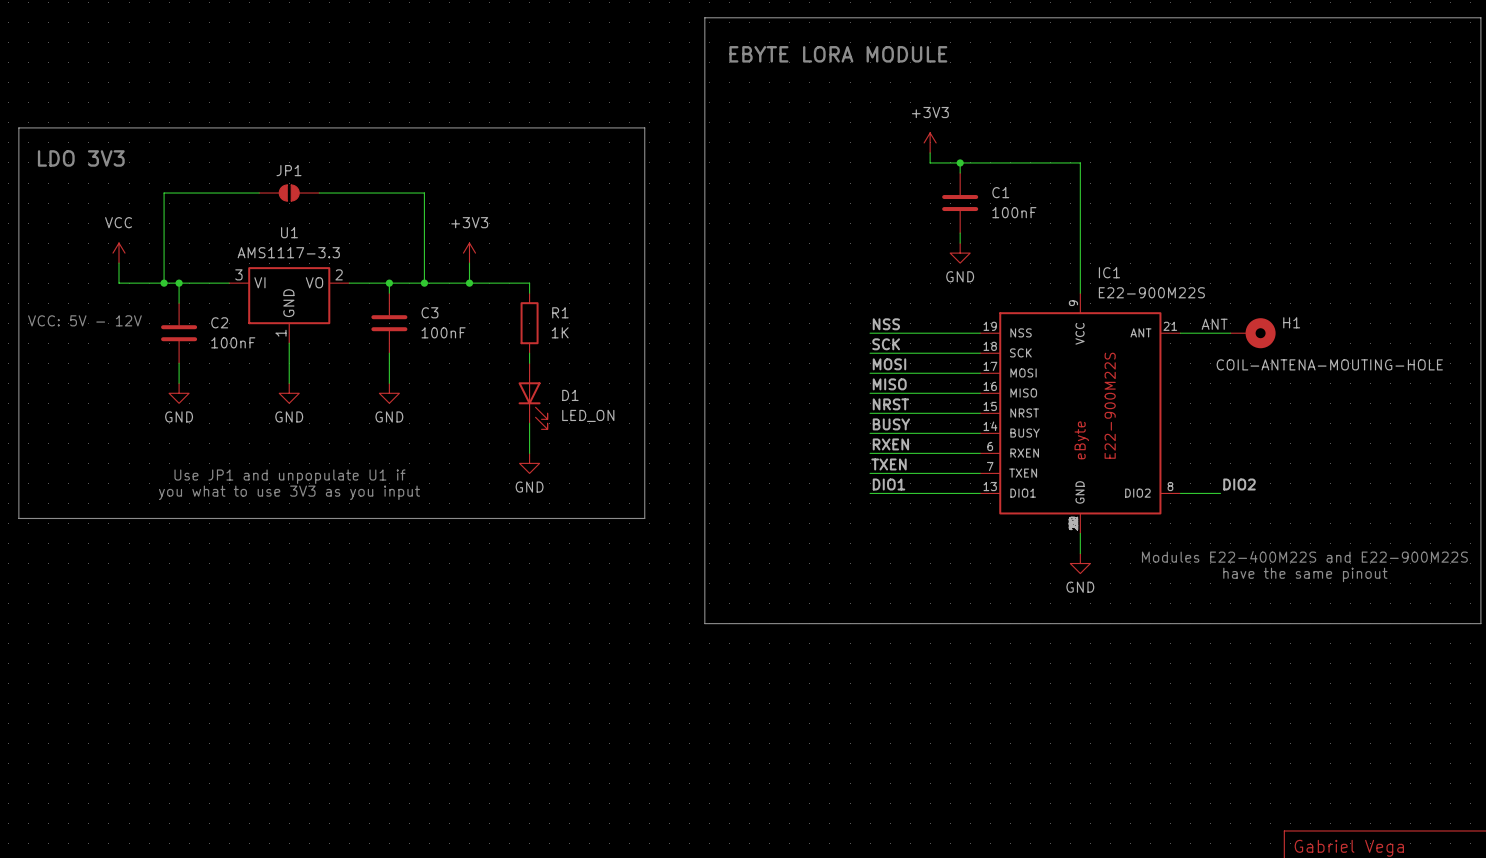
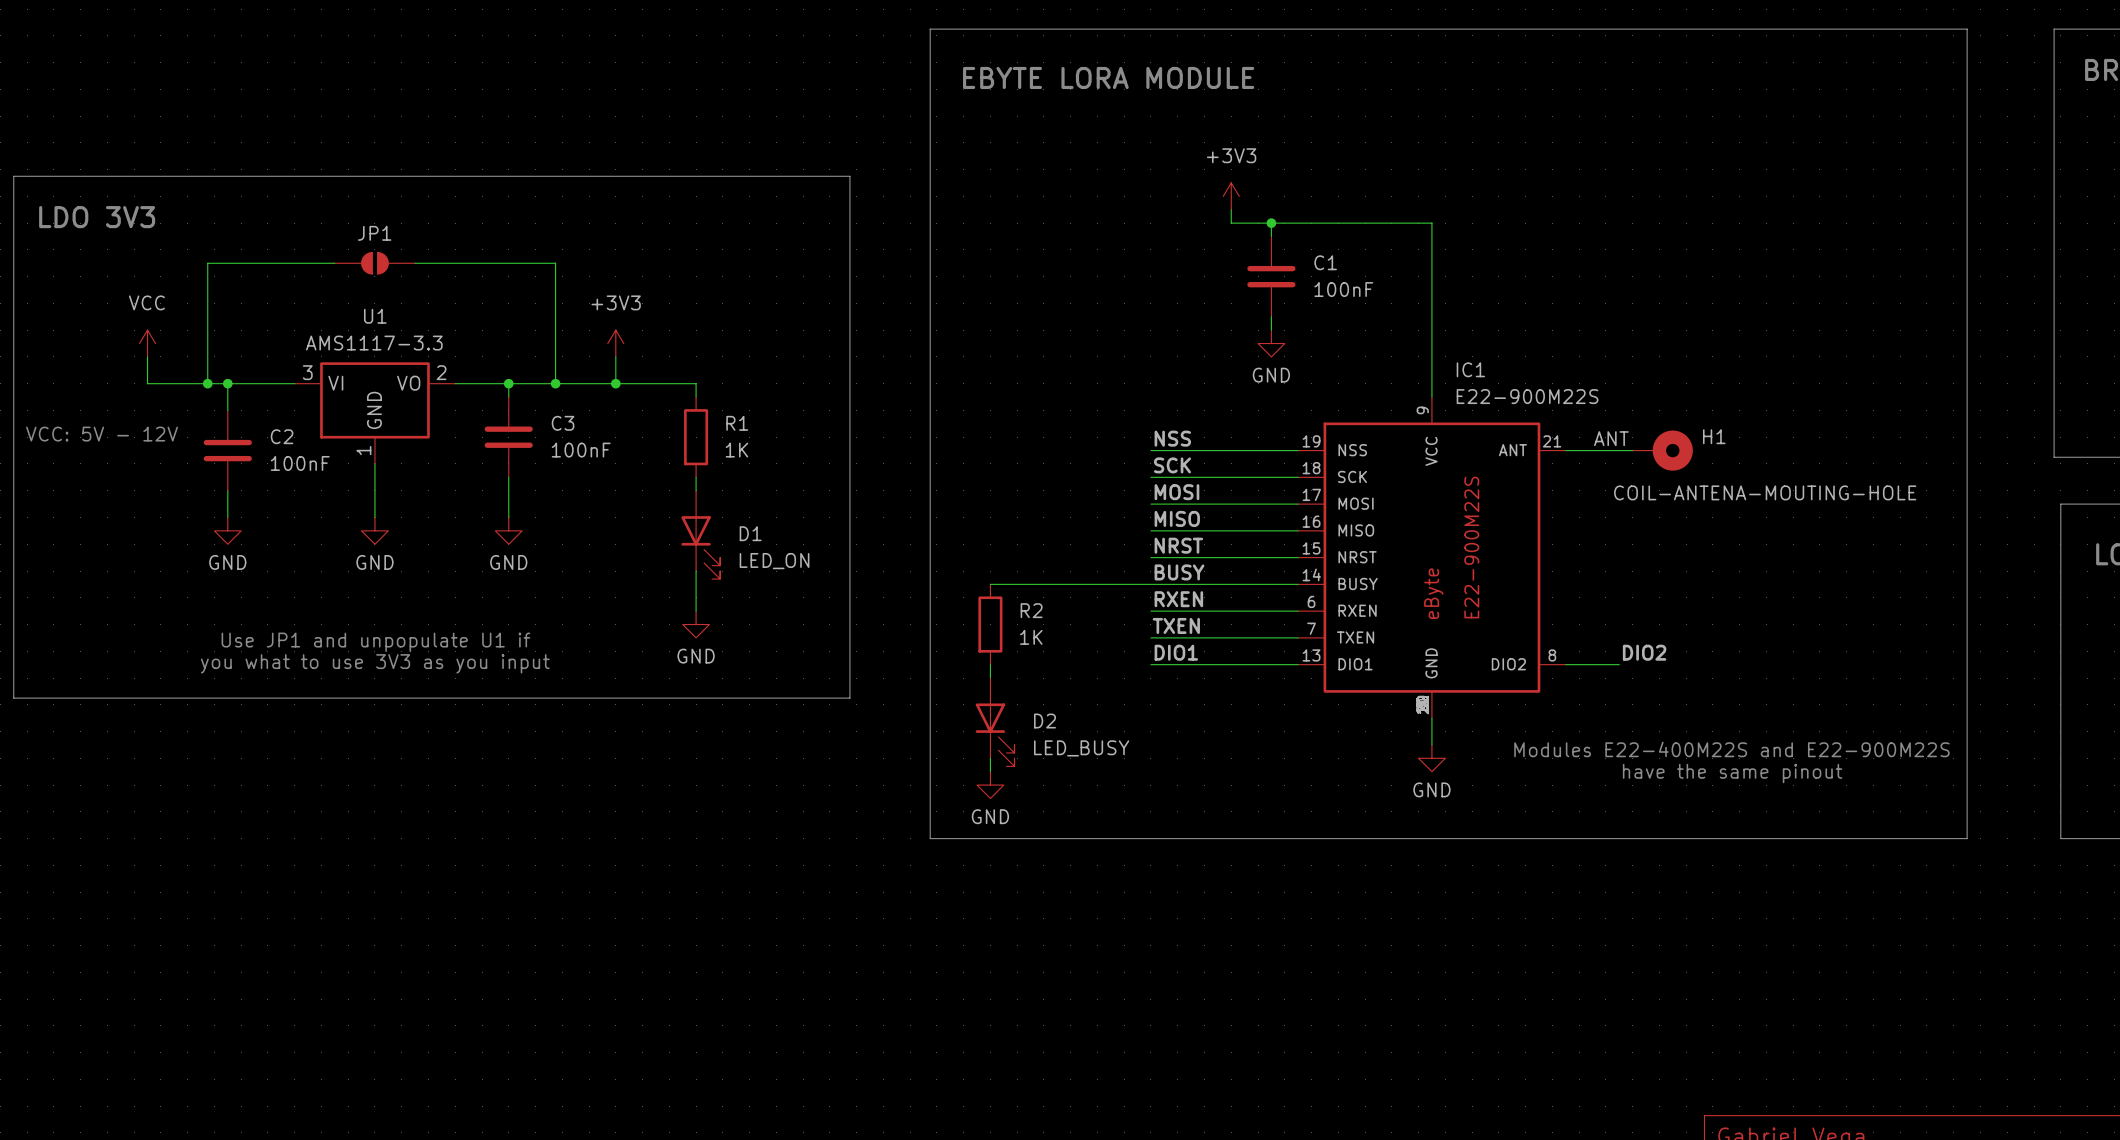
wire: none -> (990, 584) (1150, 584)
R2: none -> 1K (990, 624)
wire: none -> (990, 664) (990, 678)
D2: none -> LED_BUSY (995, 722)
wire: none -> (990, 758) (990, 771)
power symbol: none -> GND (990, 785)

